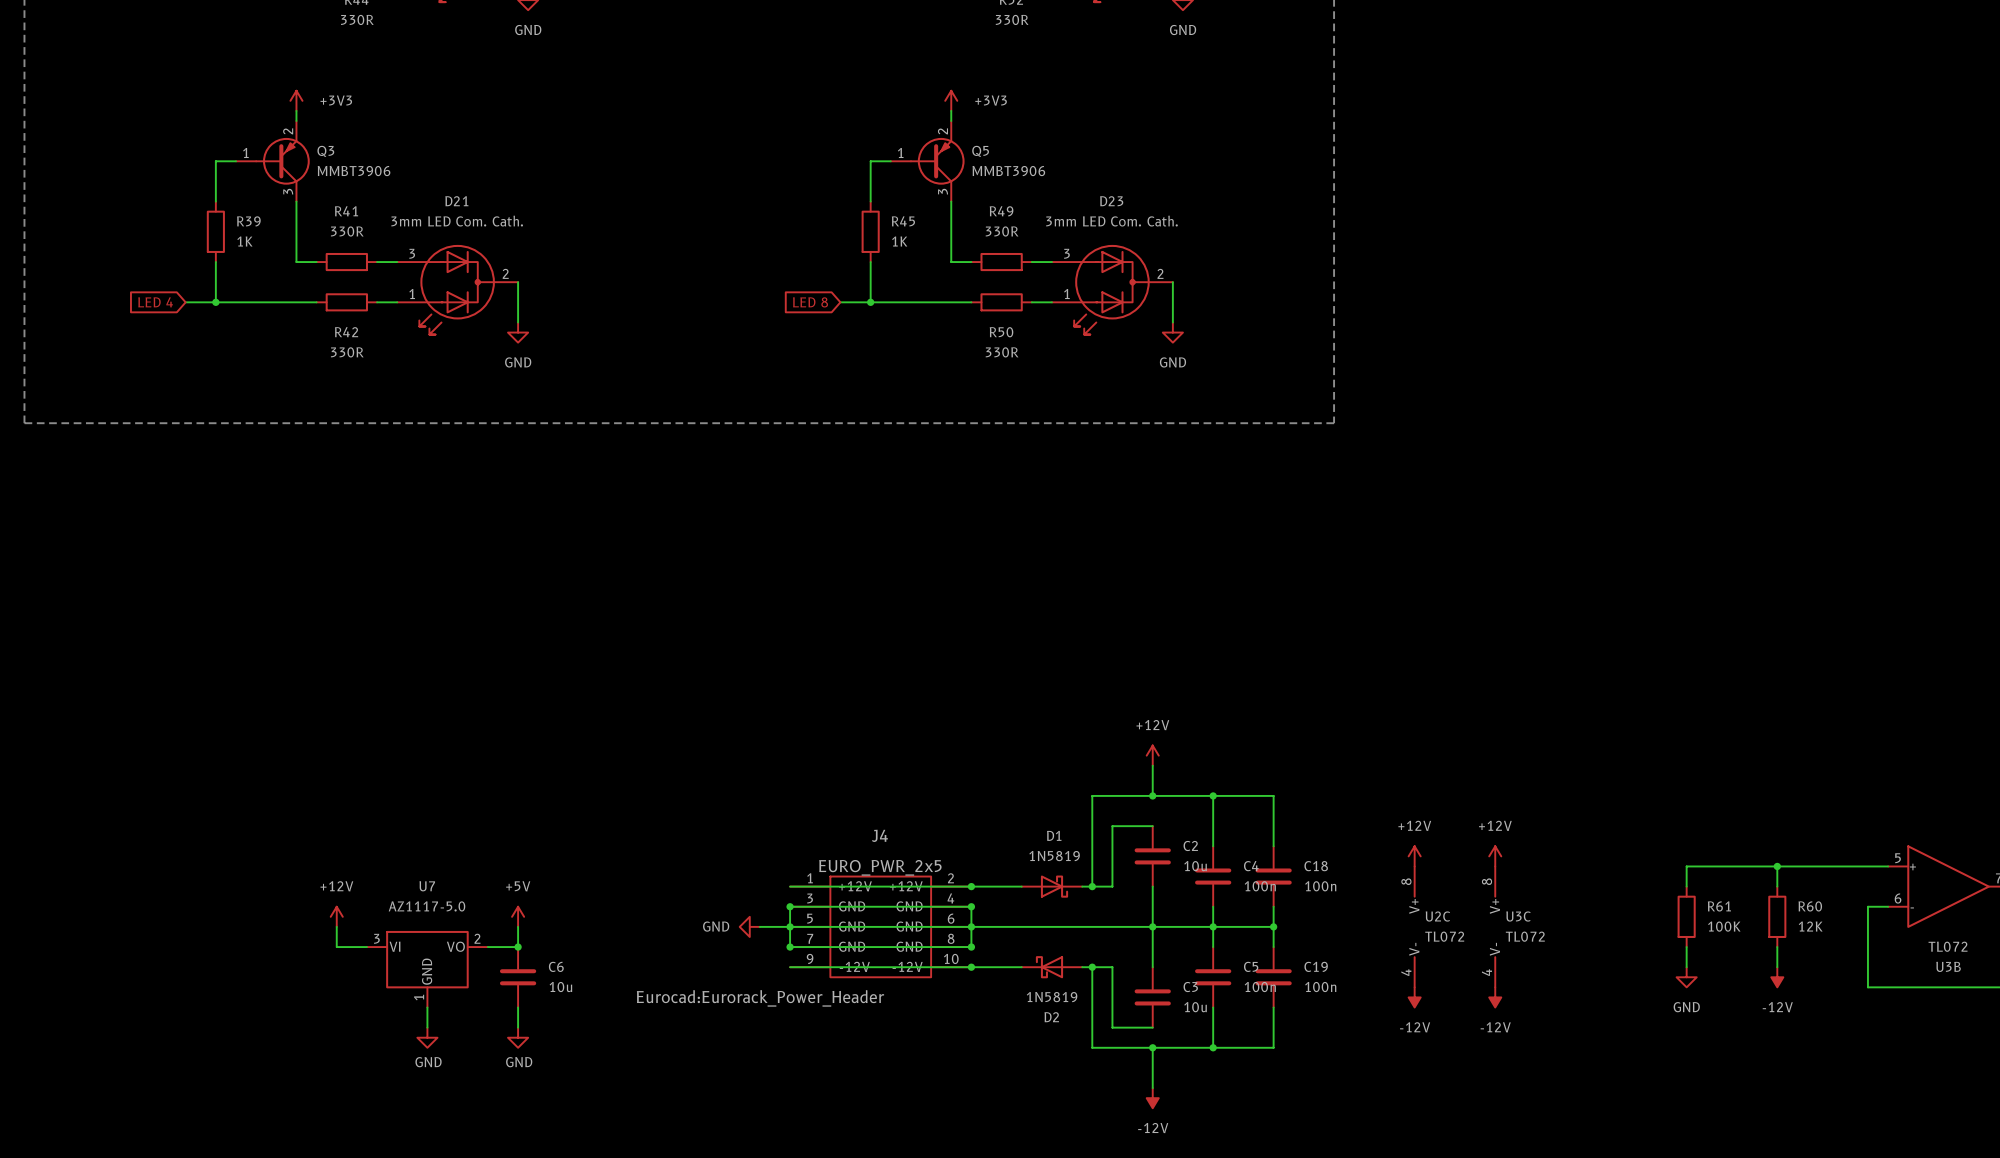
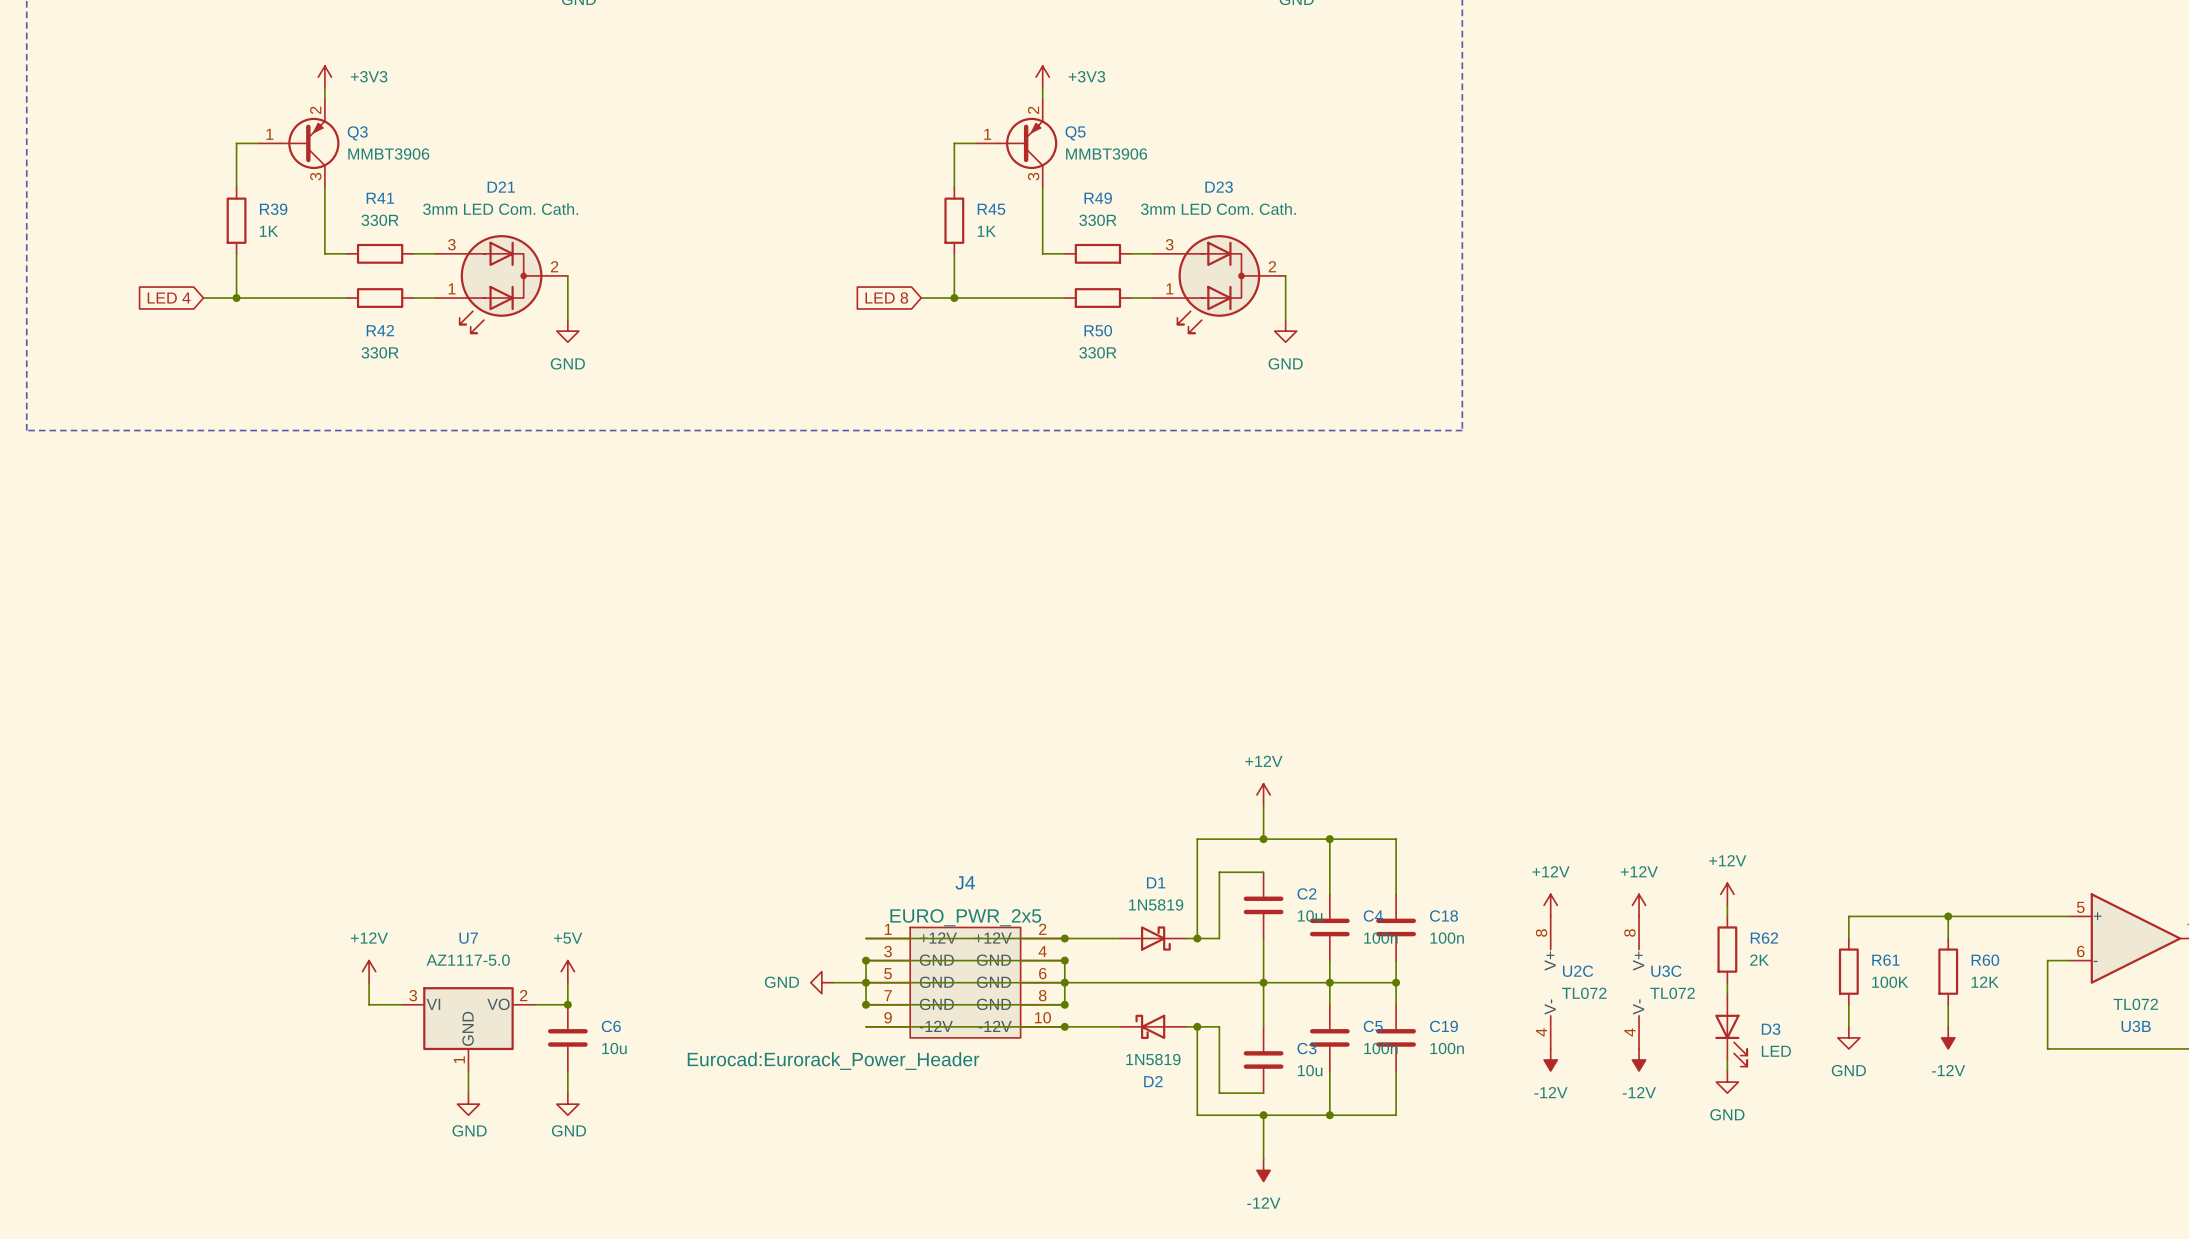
power symbol: none -> +12V (1727, 894)
wire: none -> (1727, 905) (1727, 916)
R62: none -> 2K (1727, 949)
wire: none -> (1727, 982) (1727, 993)
D3: none -> LED (1731, 1030)
wire: none -> (1727, 1059) (1727, 1071)
power symbol: none -> GND (1727, 1082)

